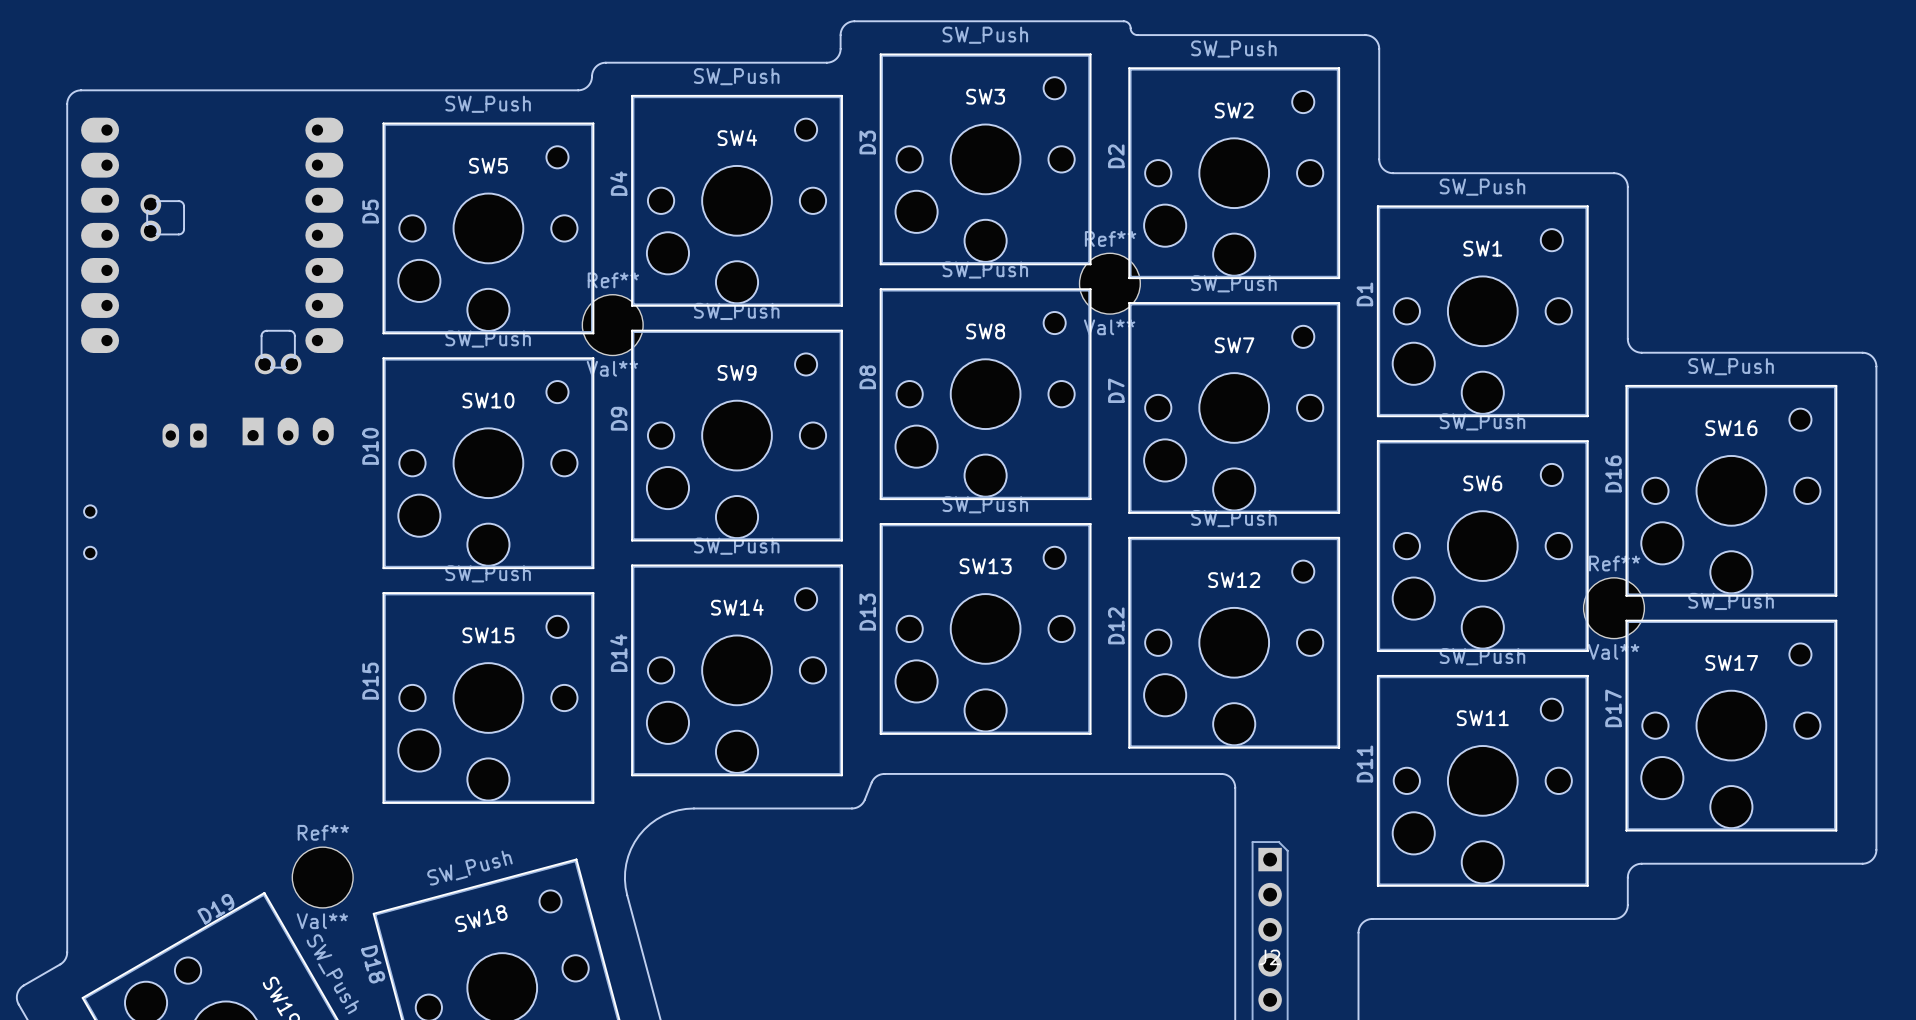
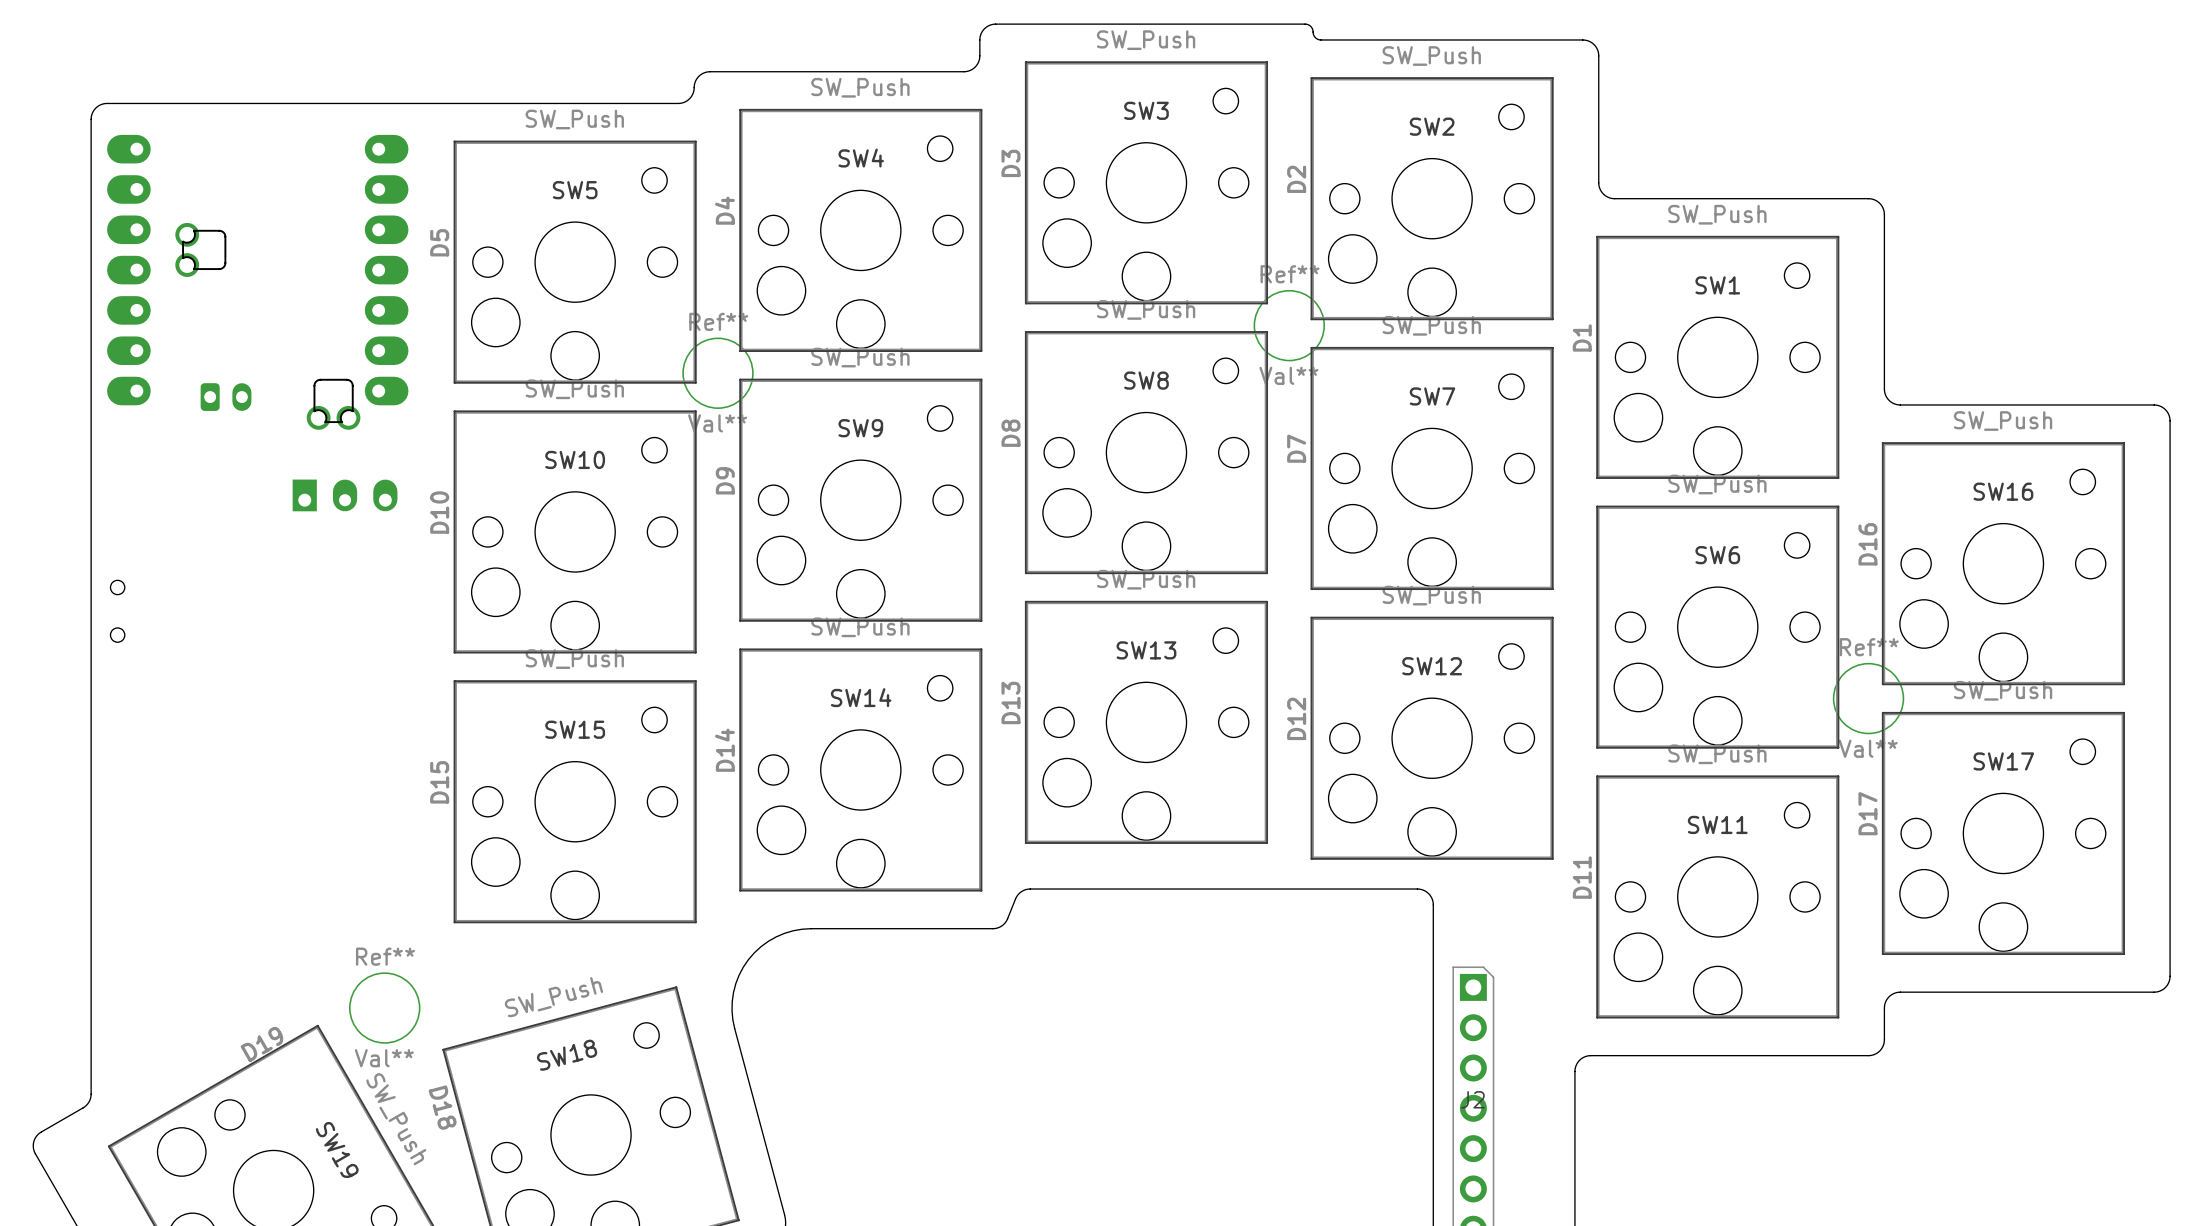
part rotation: 0° (184, 435) -> 180° (226, 397)
part position: (184, 435) -> (226, 397)

